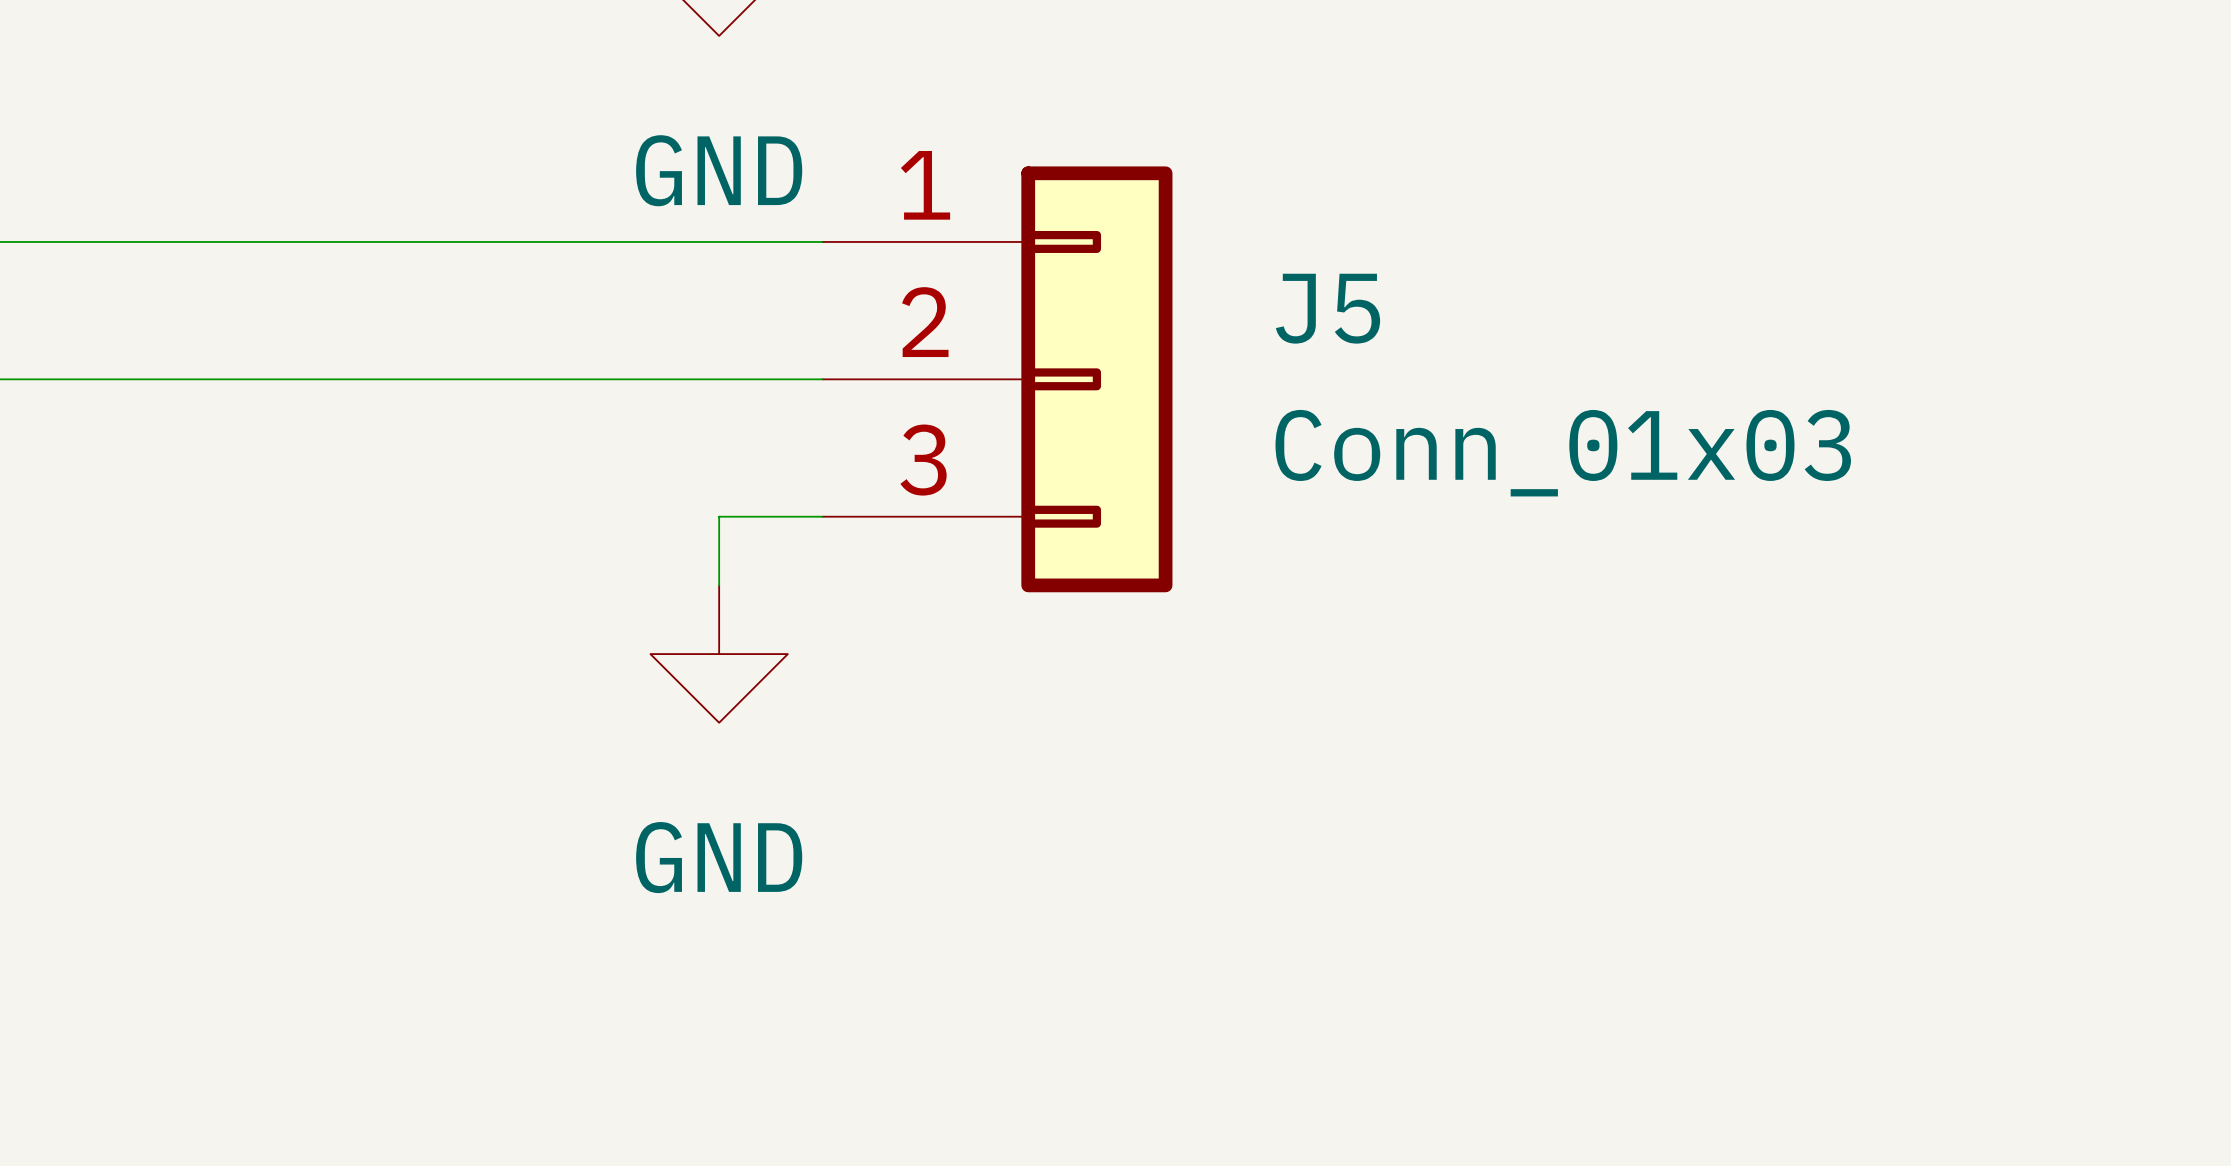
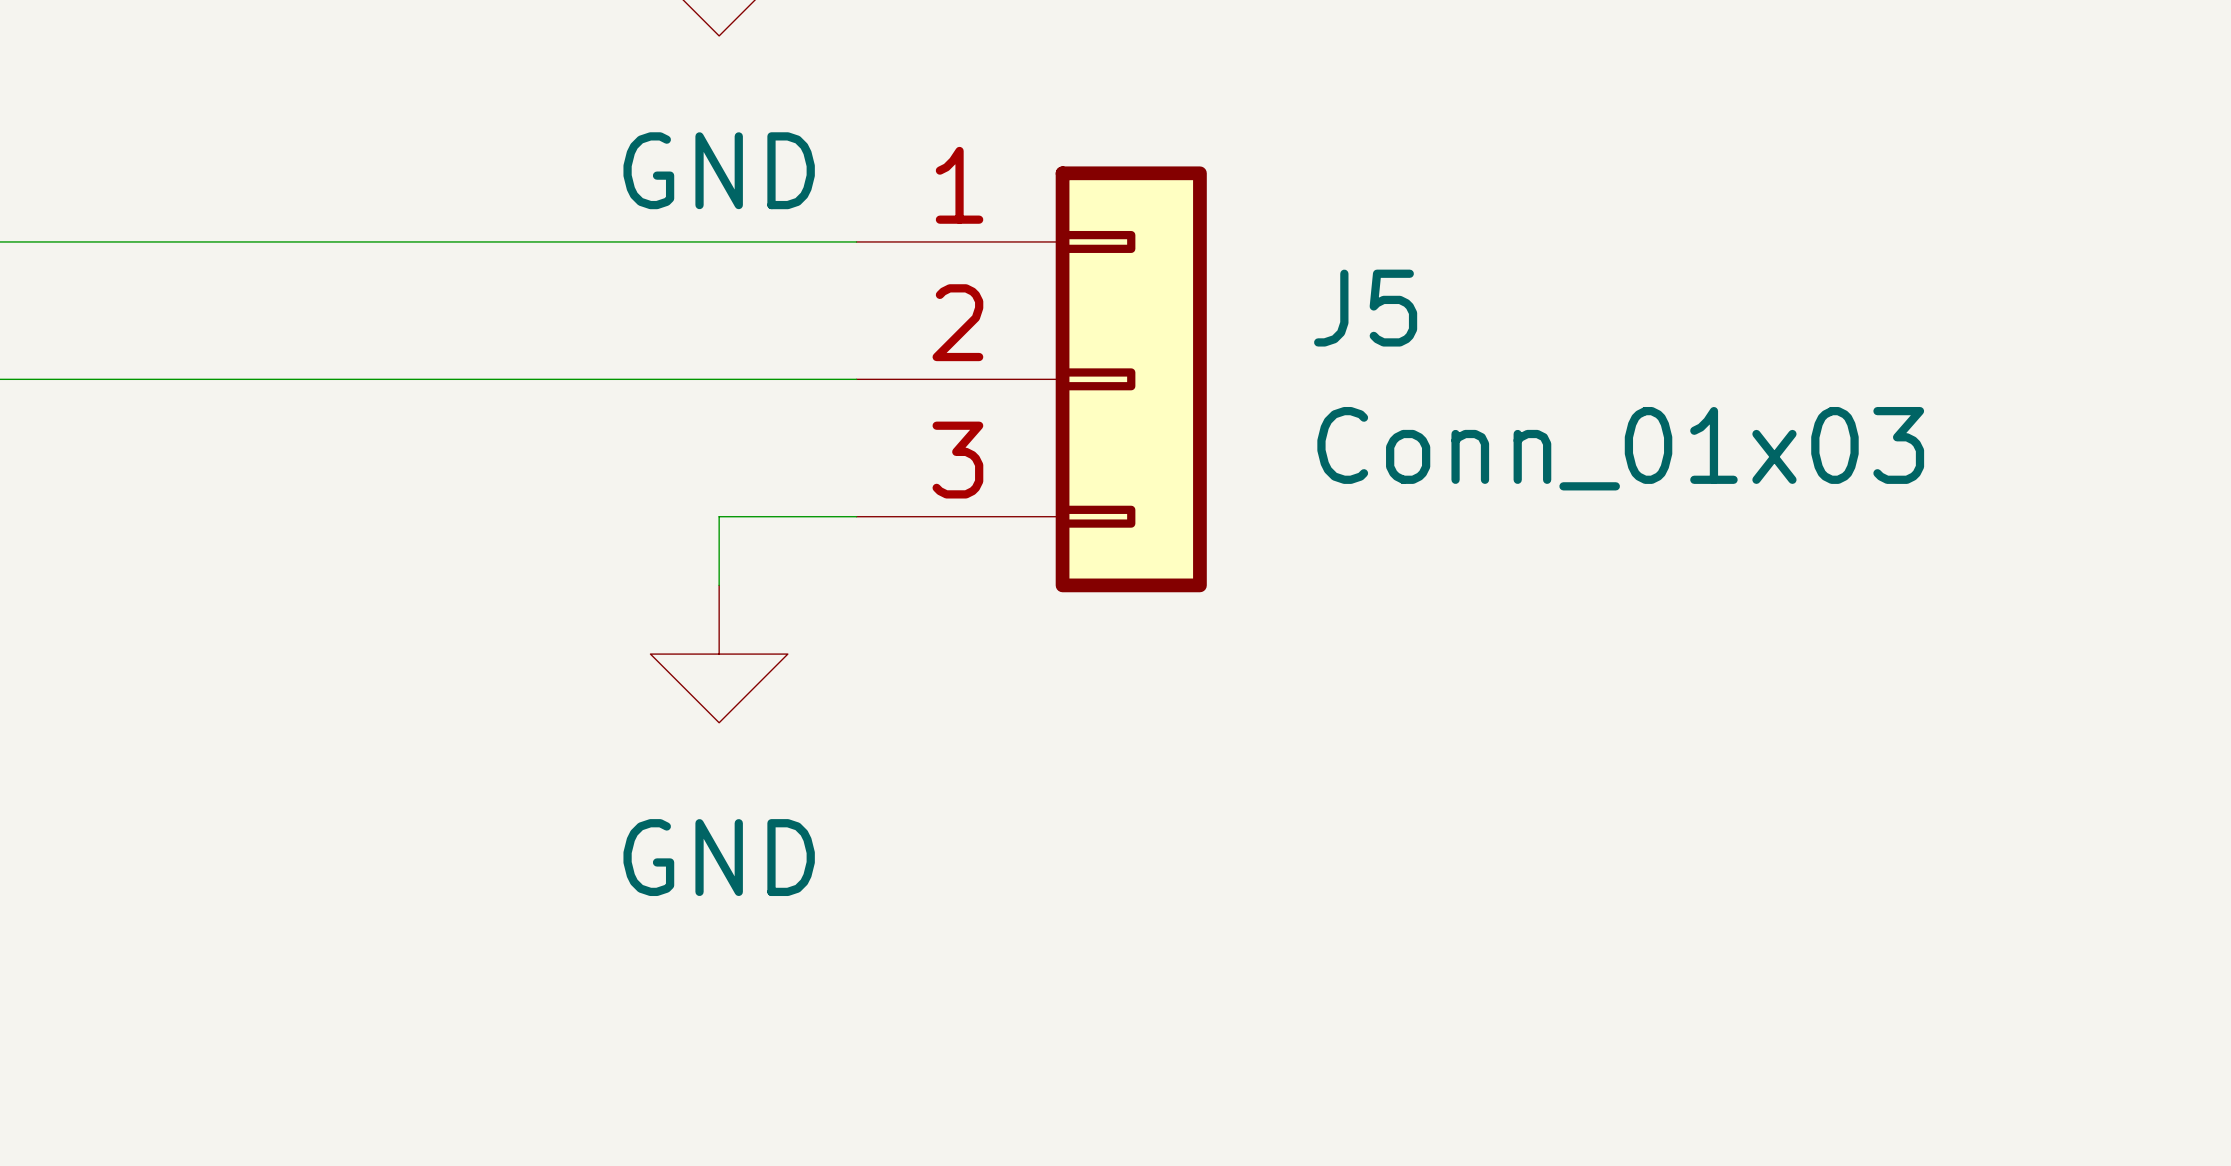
J5 position: (997, 379) -> (1031, 379)

